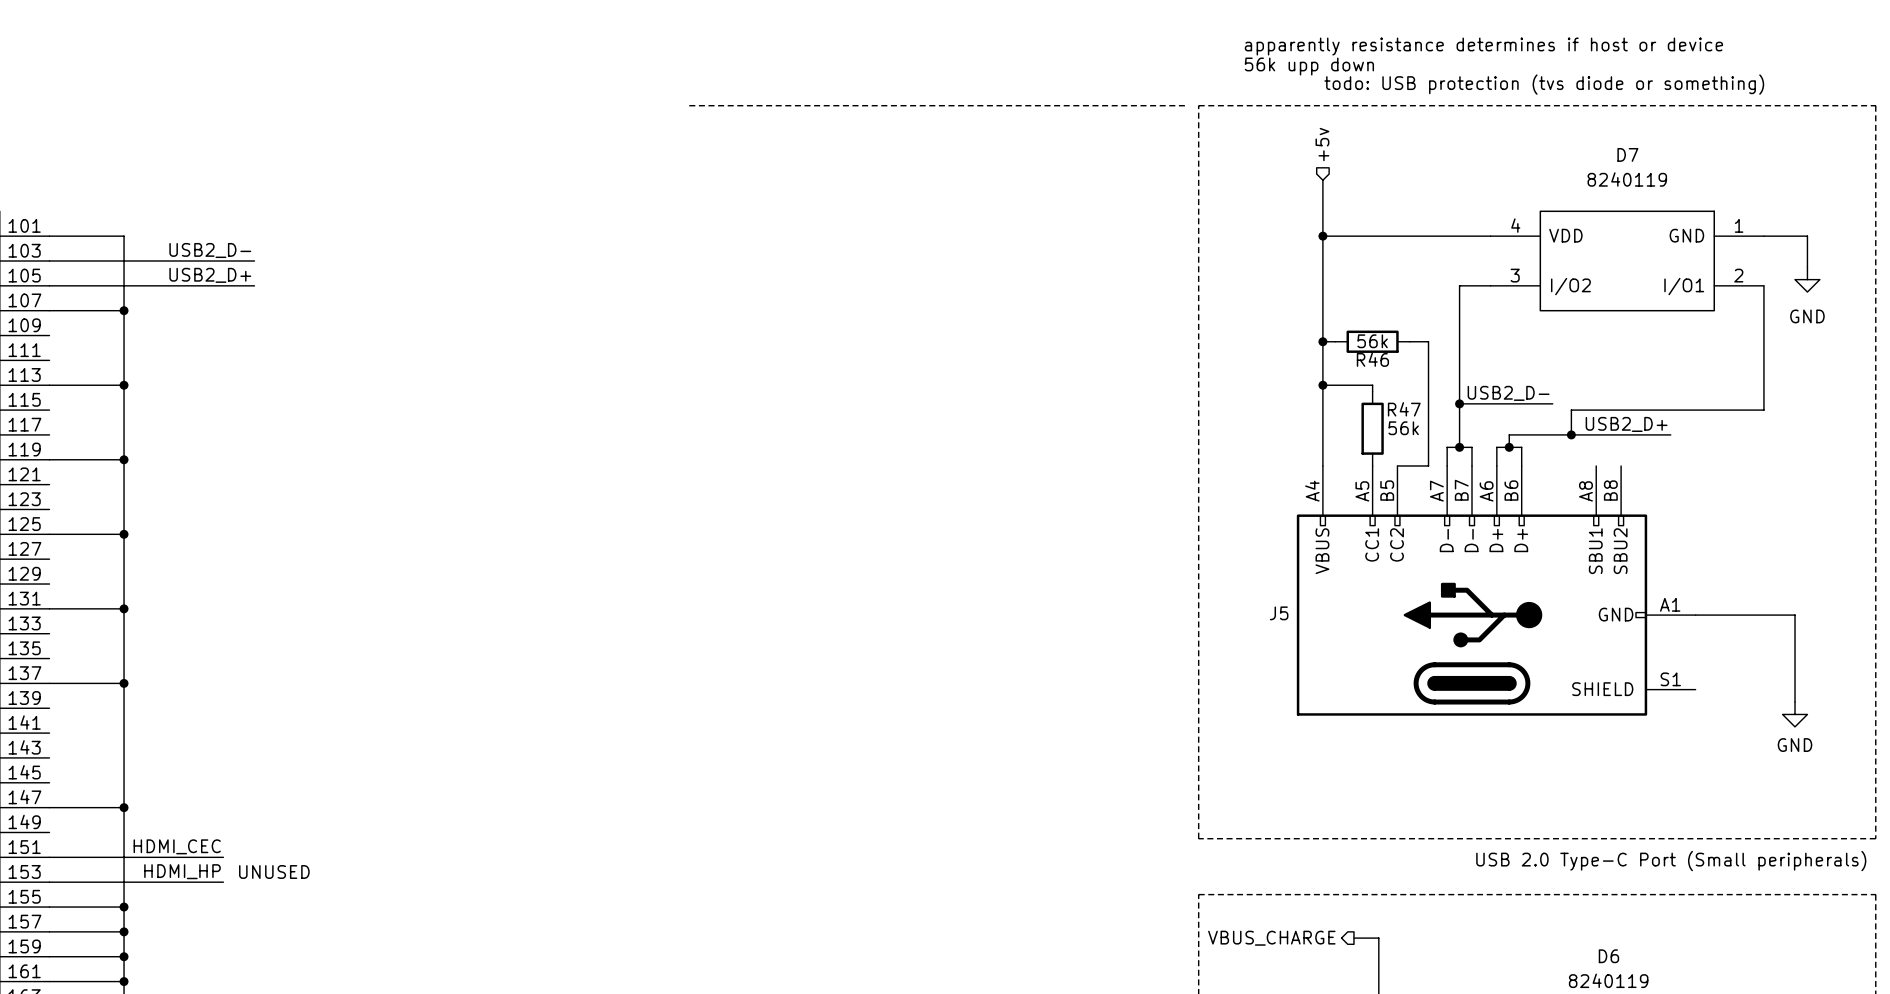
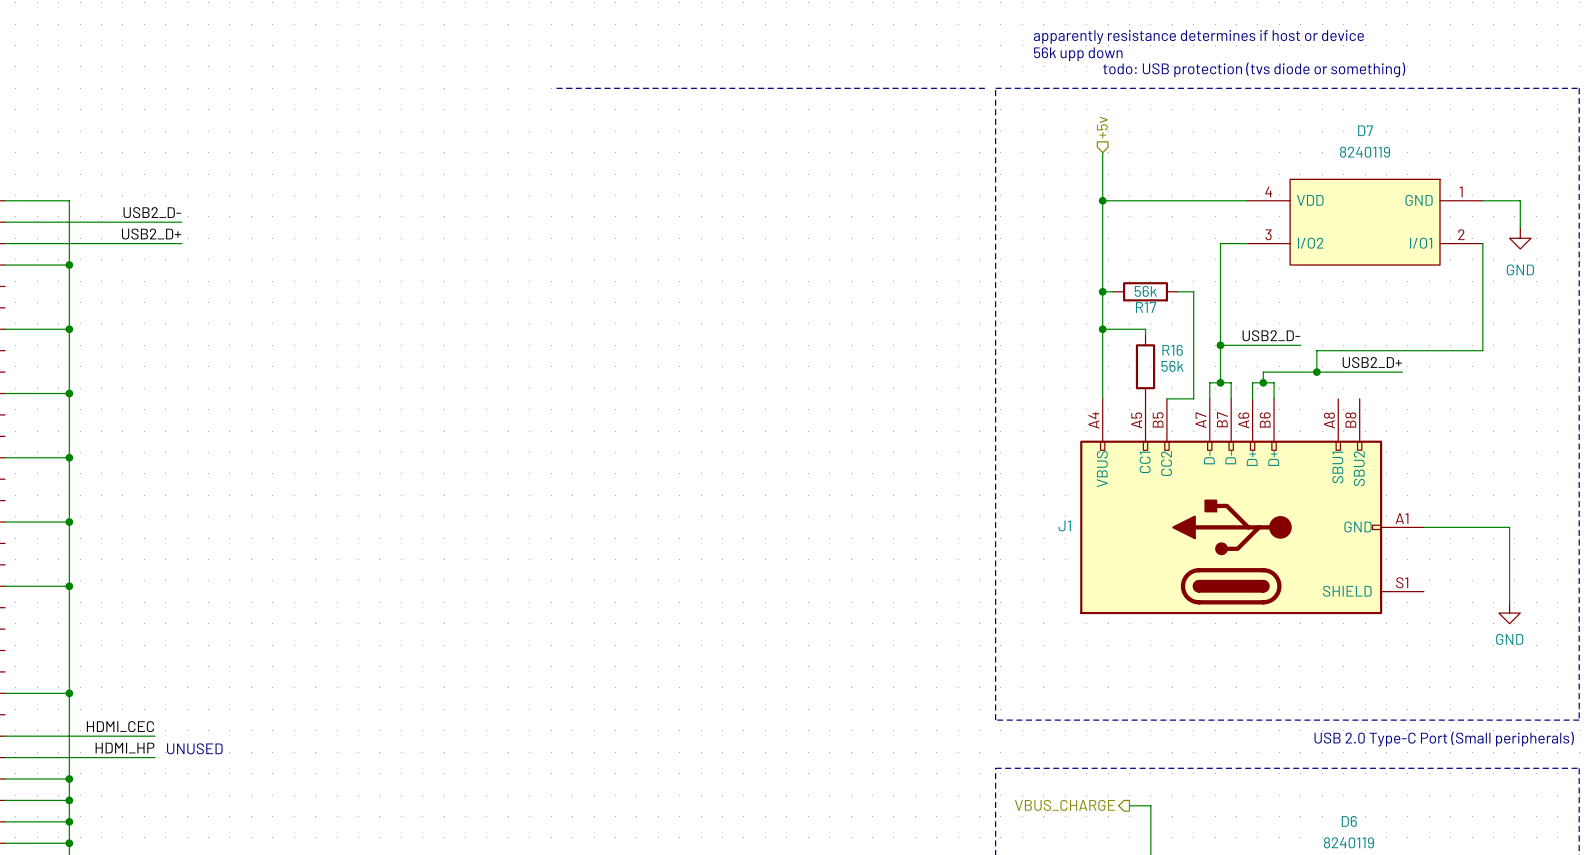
R46 name: R46 (1372, 359) -> R17 (1146, 307)
R47 name: R47 (1404, 409) -> R16 (1172, 350)
J5 name: J5 (1279, 613) -> J1 (1064, 525)

